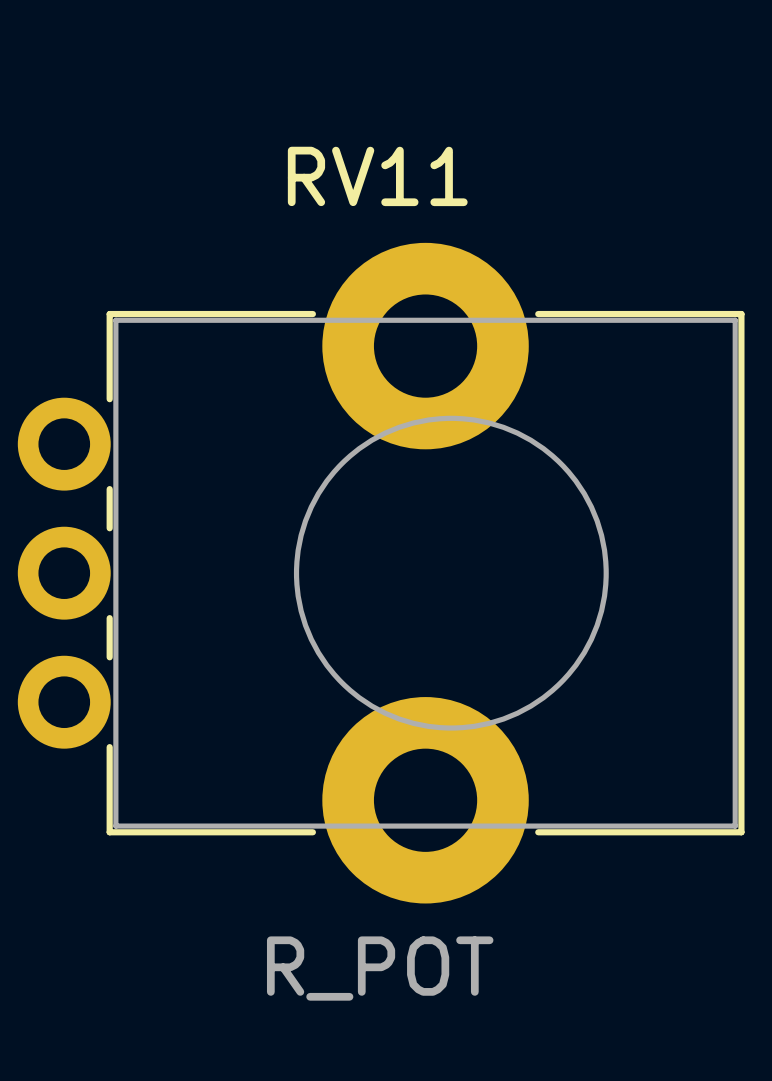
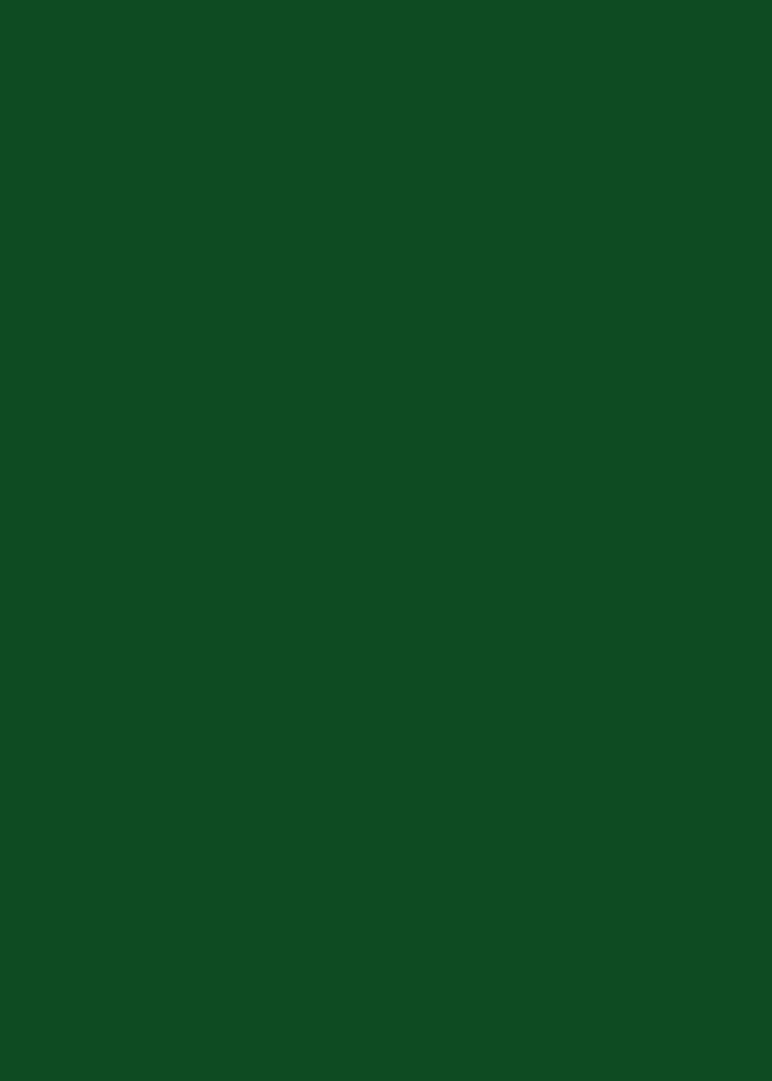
RV11: R_POT (381, 573) -> none

